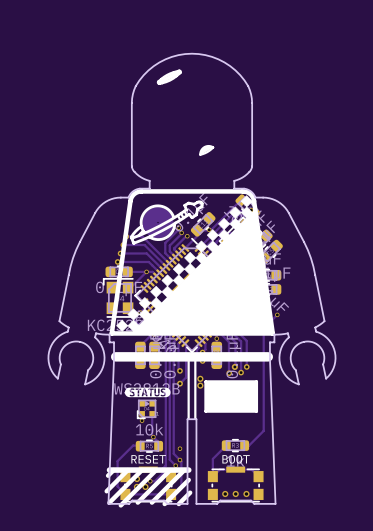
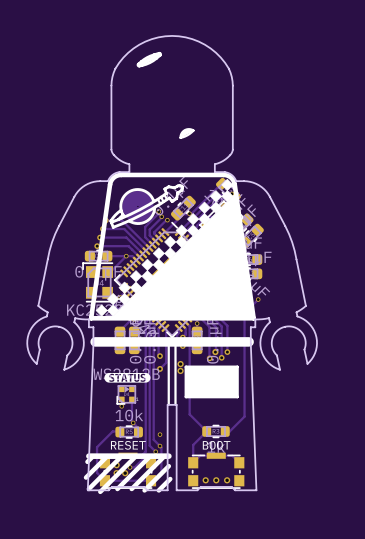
track: none -> (185, 321) (189, 326) (189, 414) (206, 431)

